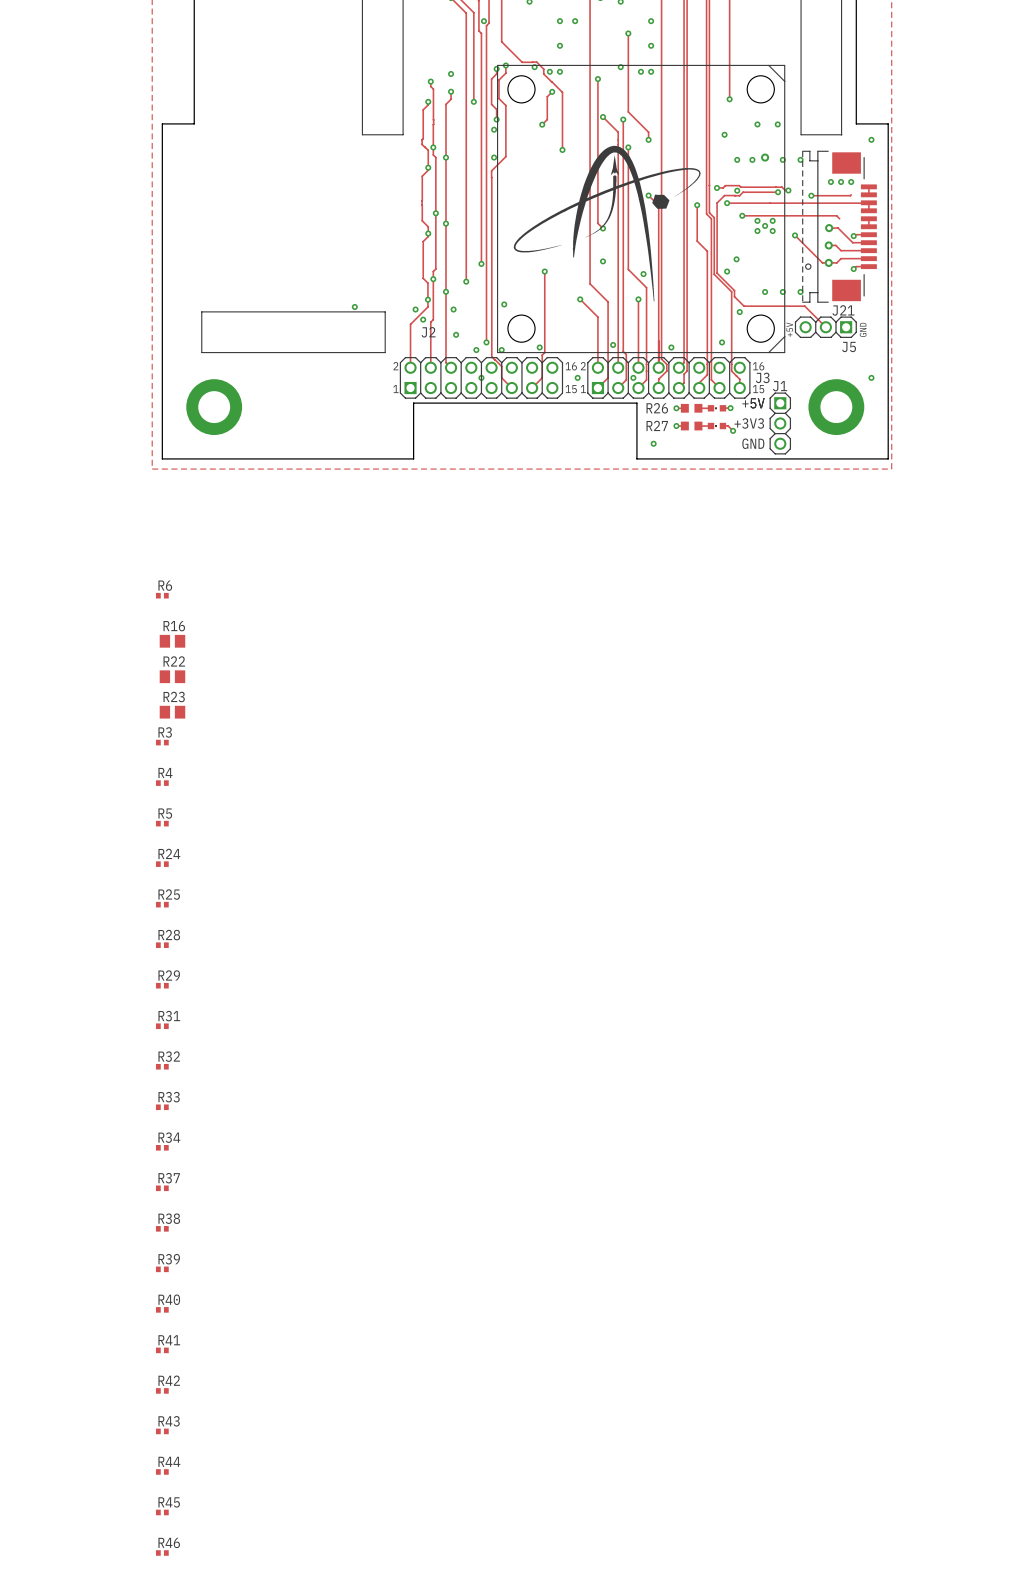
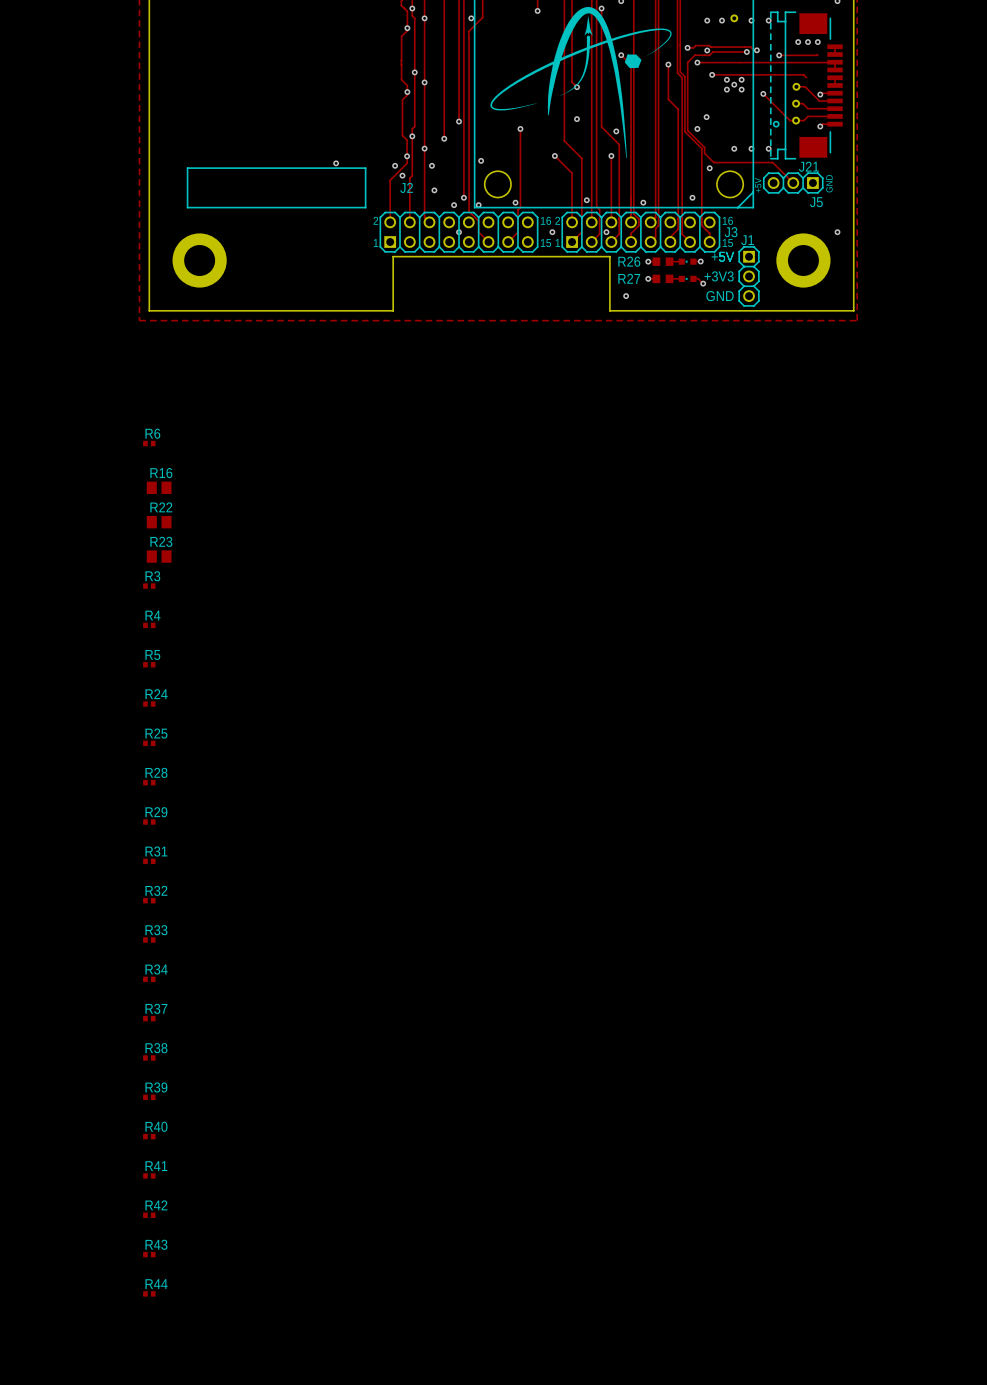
R45: (162, 1512) -> none
R46: (162, 1552) -> none

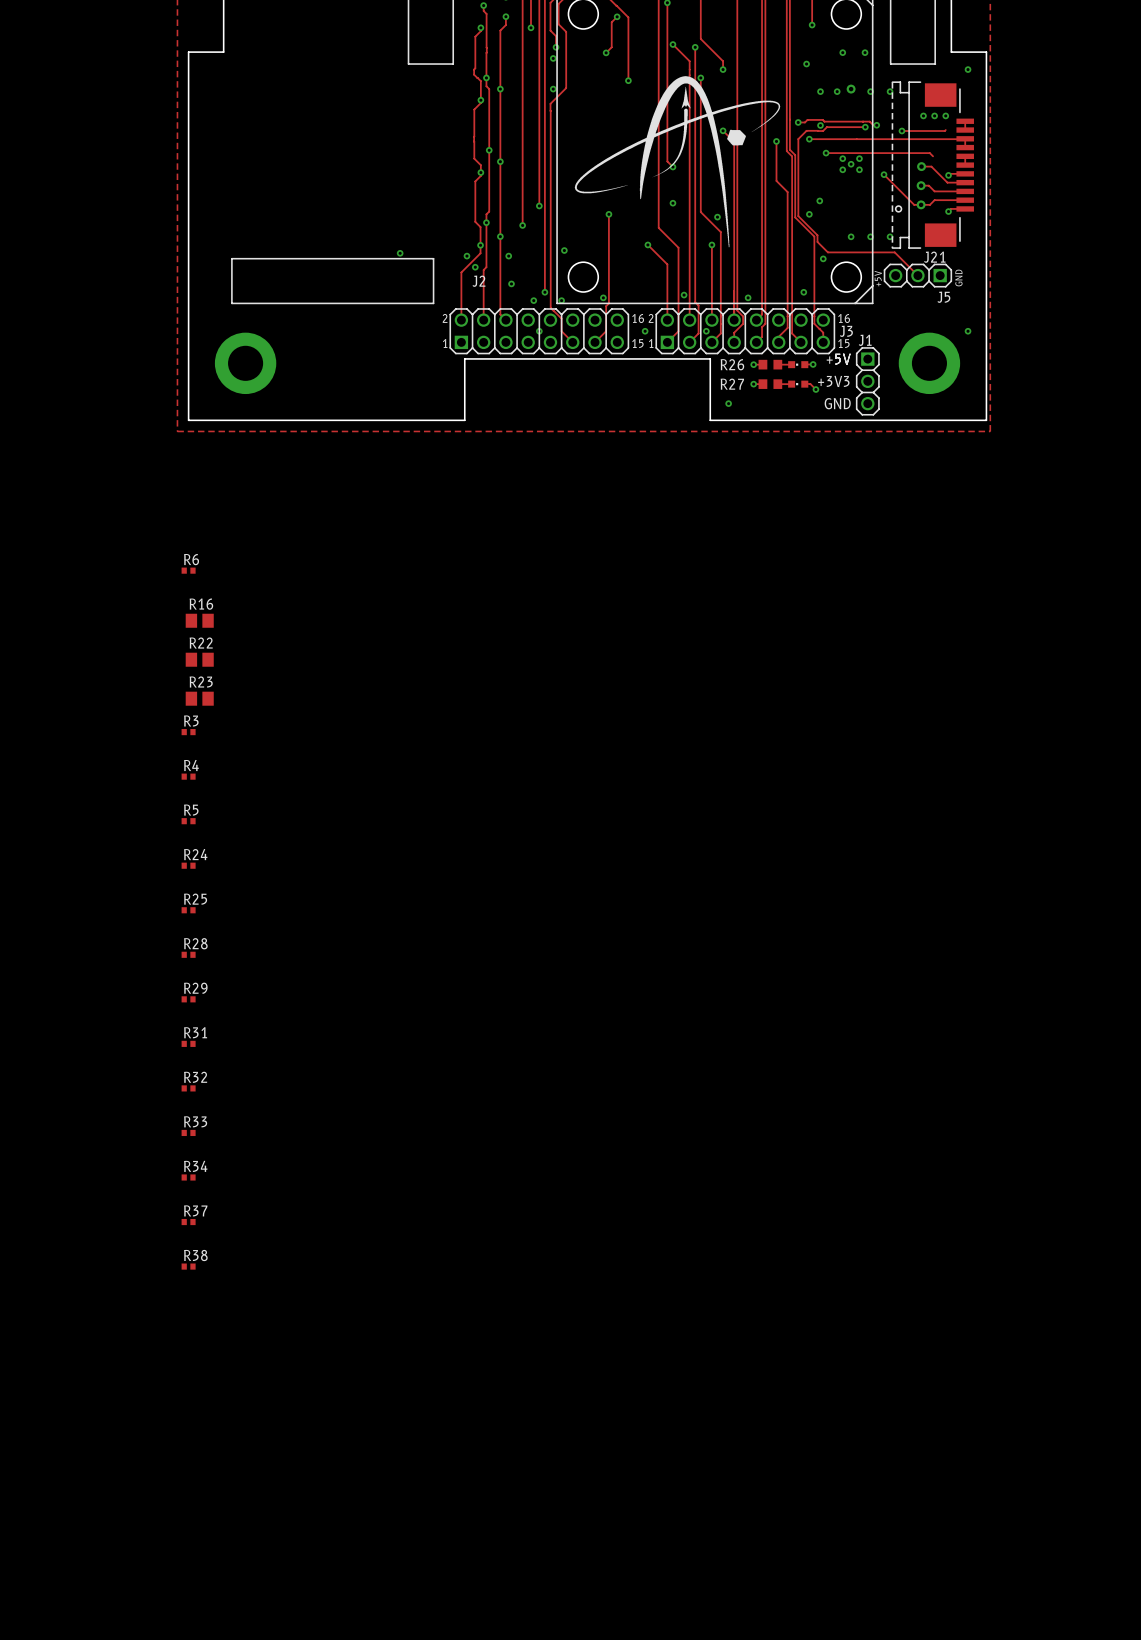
R39: (149, 1097) -> none
R40: (149, 1136) -> none
R41: (149, 1175) -> none
R42: (149, 1215) -> none
R43: (149, 1254) -> none
R44: (149, 1293) -> none

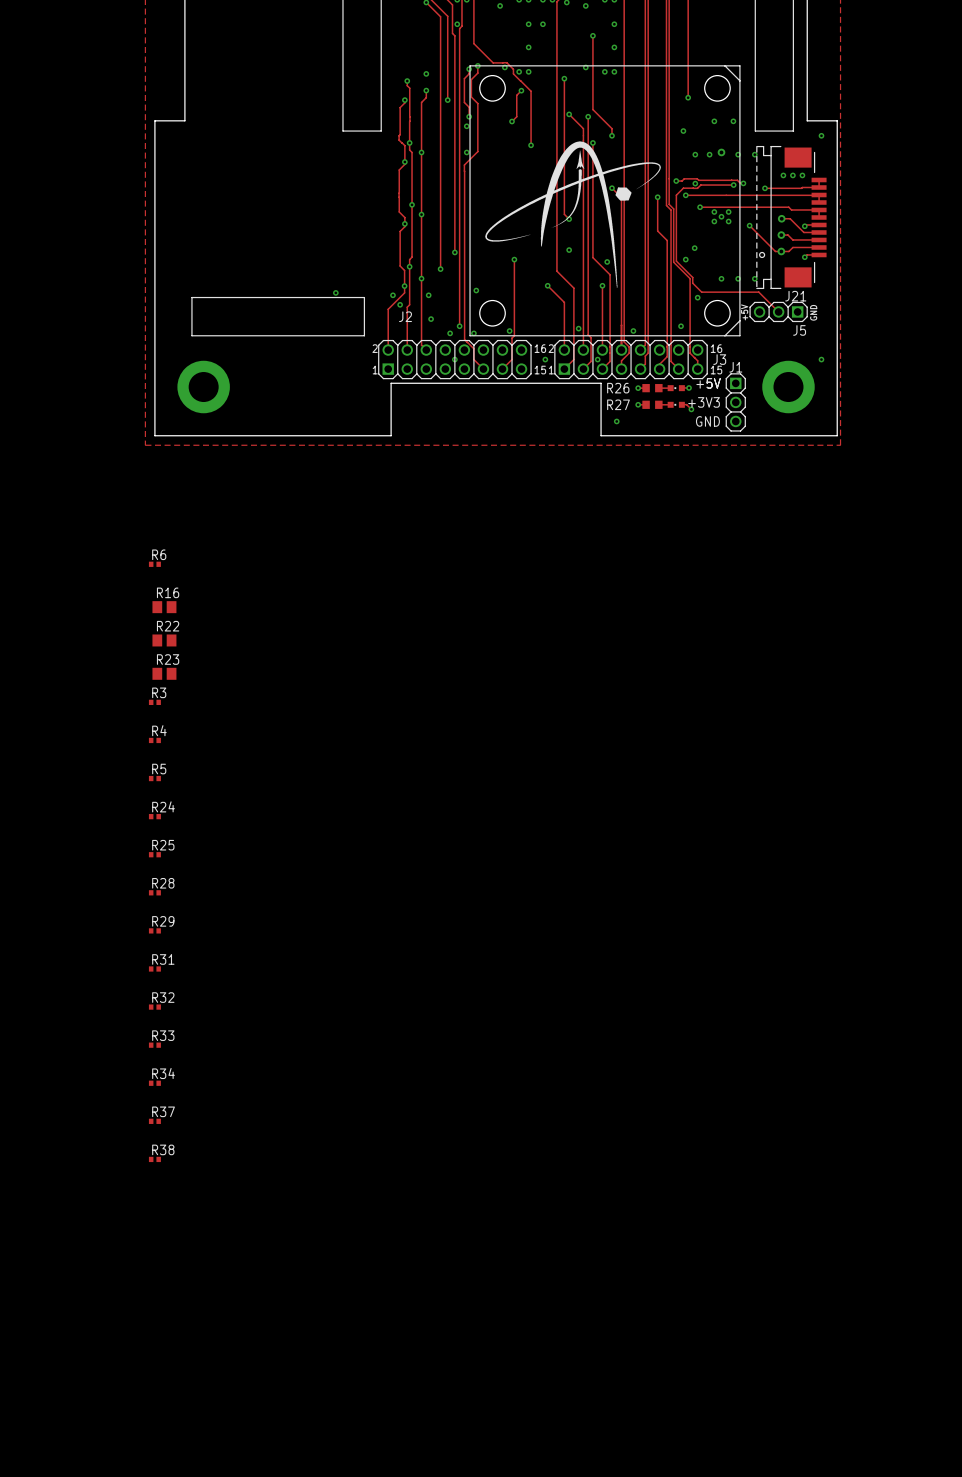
track: none -> (802, 187) (819, 187)
track: none -> (791, 209) (819, 209)

